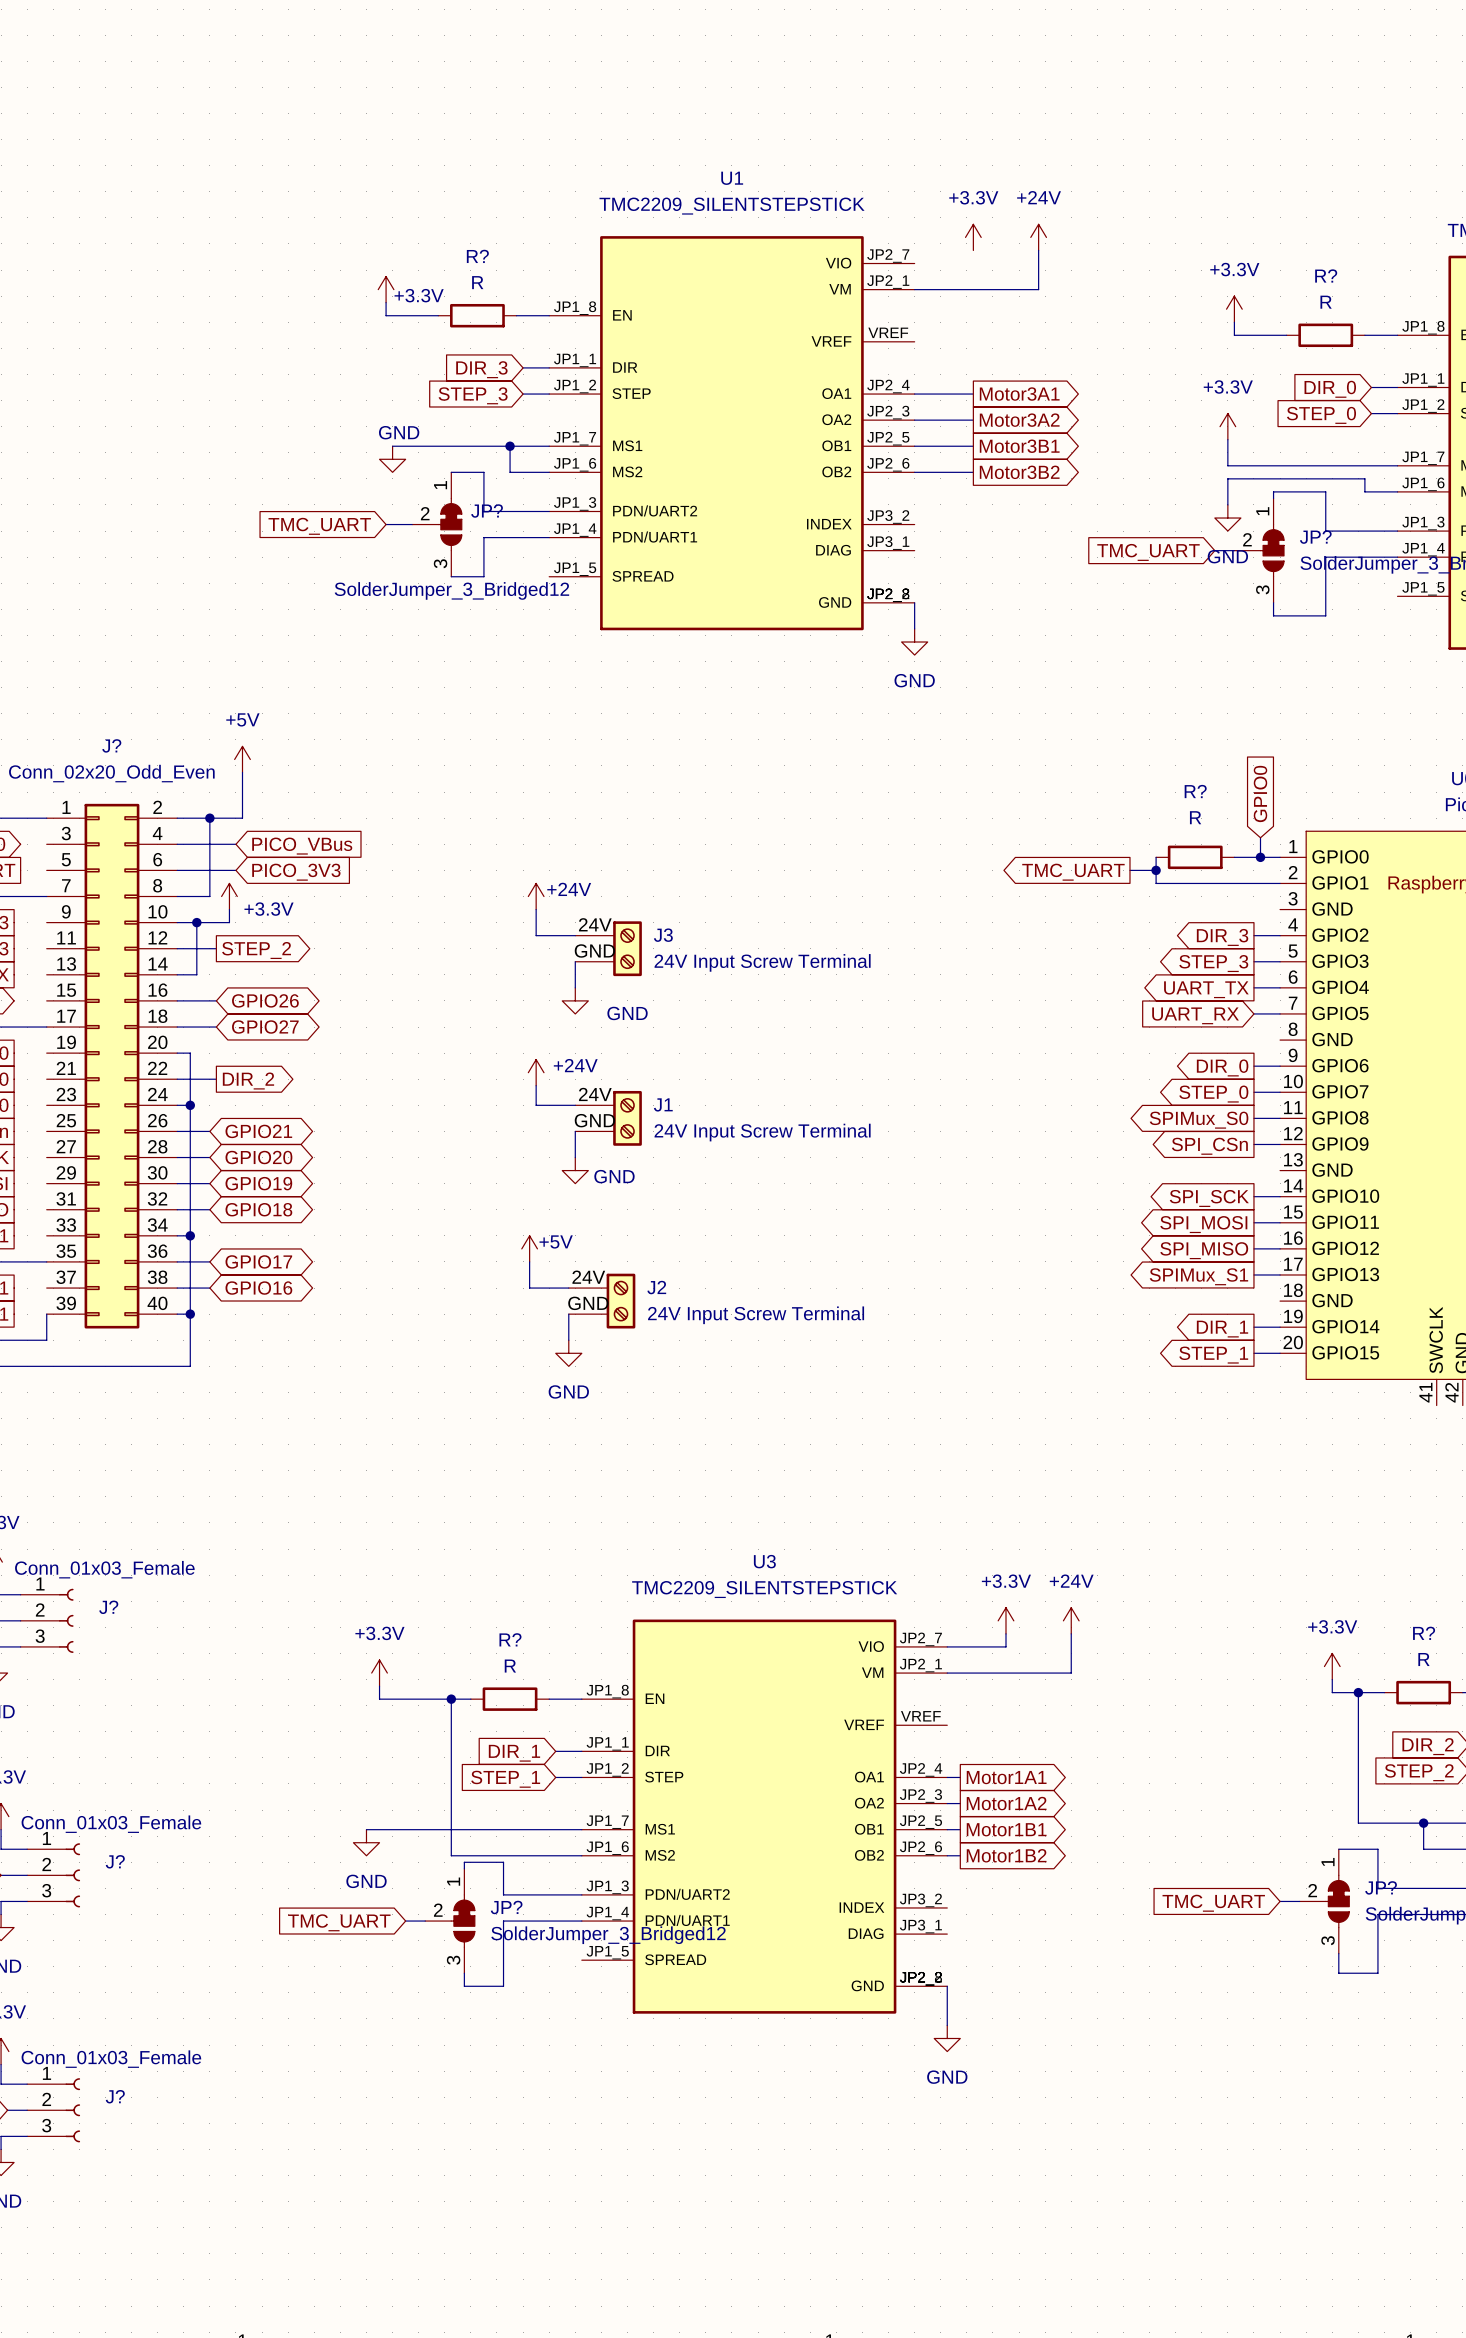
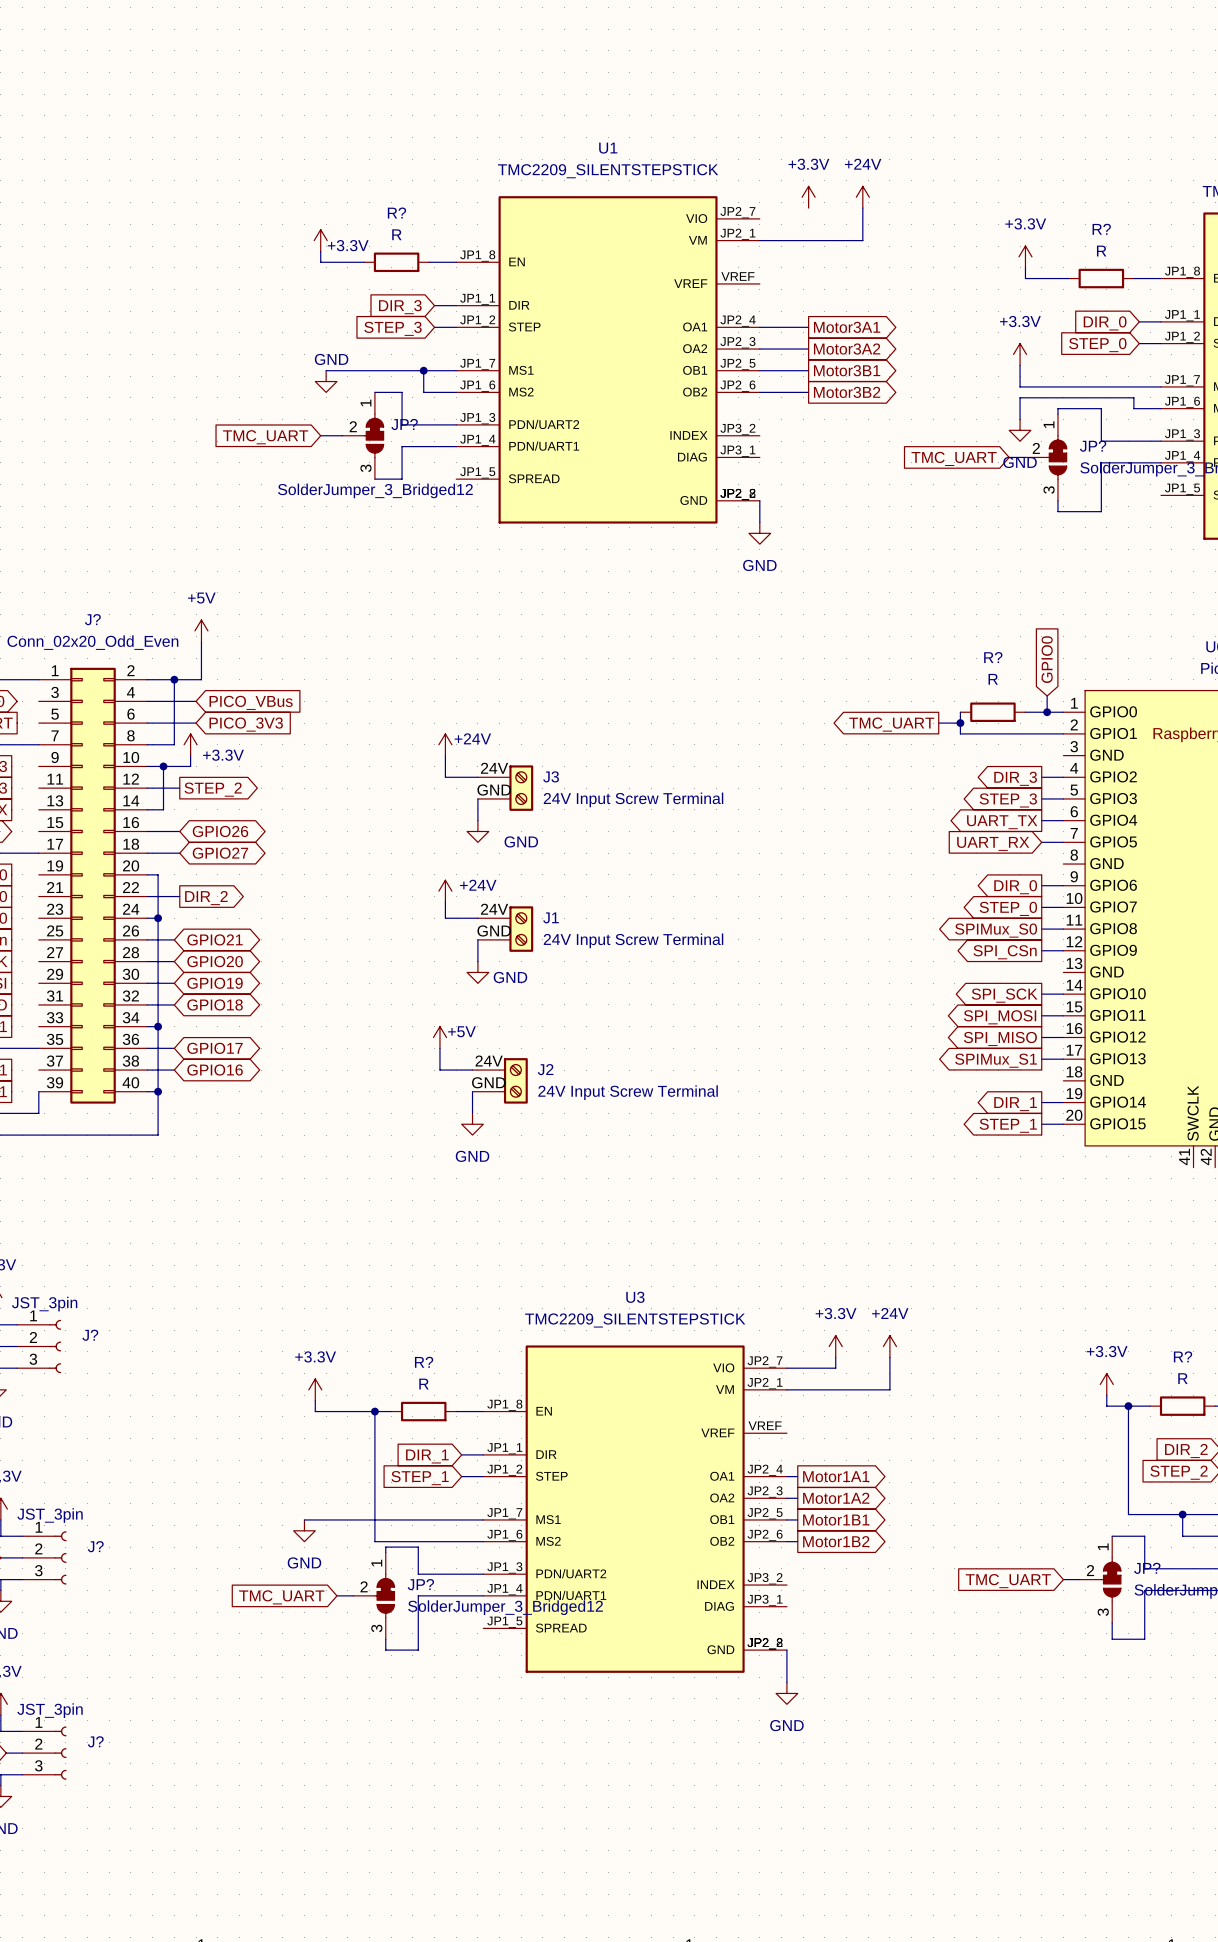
J? value: Conn_01x03_Female (104, 1569) -> JST_3pin (44, 1304)
J? value: Conn_01x03_Female (111, 1824) -> JST_3pin (50, 1515)
J? value: Conn_01x03_Female (111, 2059) -> JST_3pin (50, 1710)

